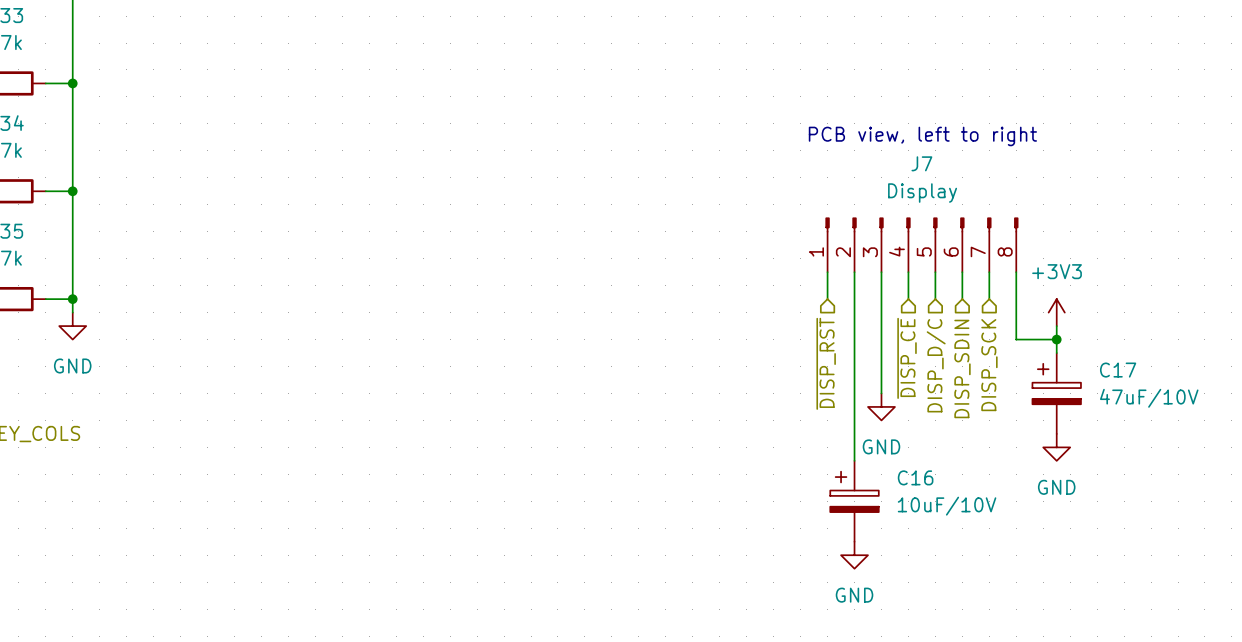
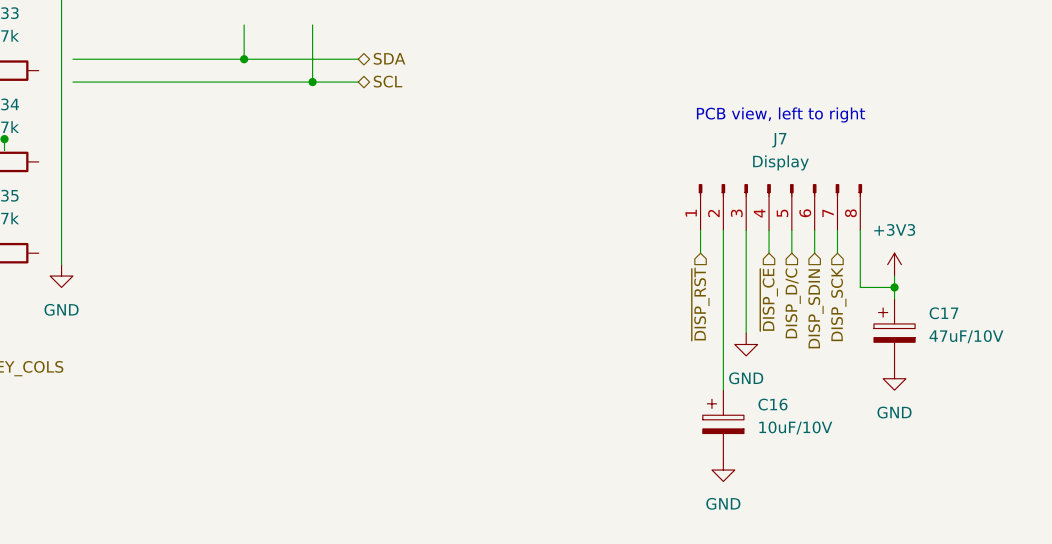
wire: none -> (244, 25) (244, 59)
wire: none -> (312, 25) (312, 82)
wire: none -> (72, 59) (358, 59)
junction: none -> (244, 59)
hierarchical label: none -> SDA (389, 58)
wire: (45, 83) (72, 83) -> none
junction: (72, 83) -> none
wire: none -> (72, 82) (358, 82)
junction: none -> (312, 82)
hierarchical label: none -> SCL (387, 81)
wire: none -> (4, 139) (4, 150)
junction: none -> (4, 139)
wire: (45, 191) (72, 191) -> none
junction: (72, 191) -> none
wire: (45, 299) (72, 299) -> none
junction: (72, 299) -> none

